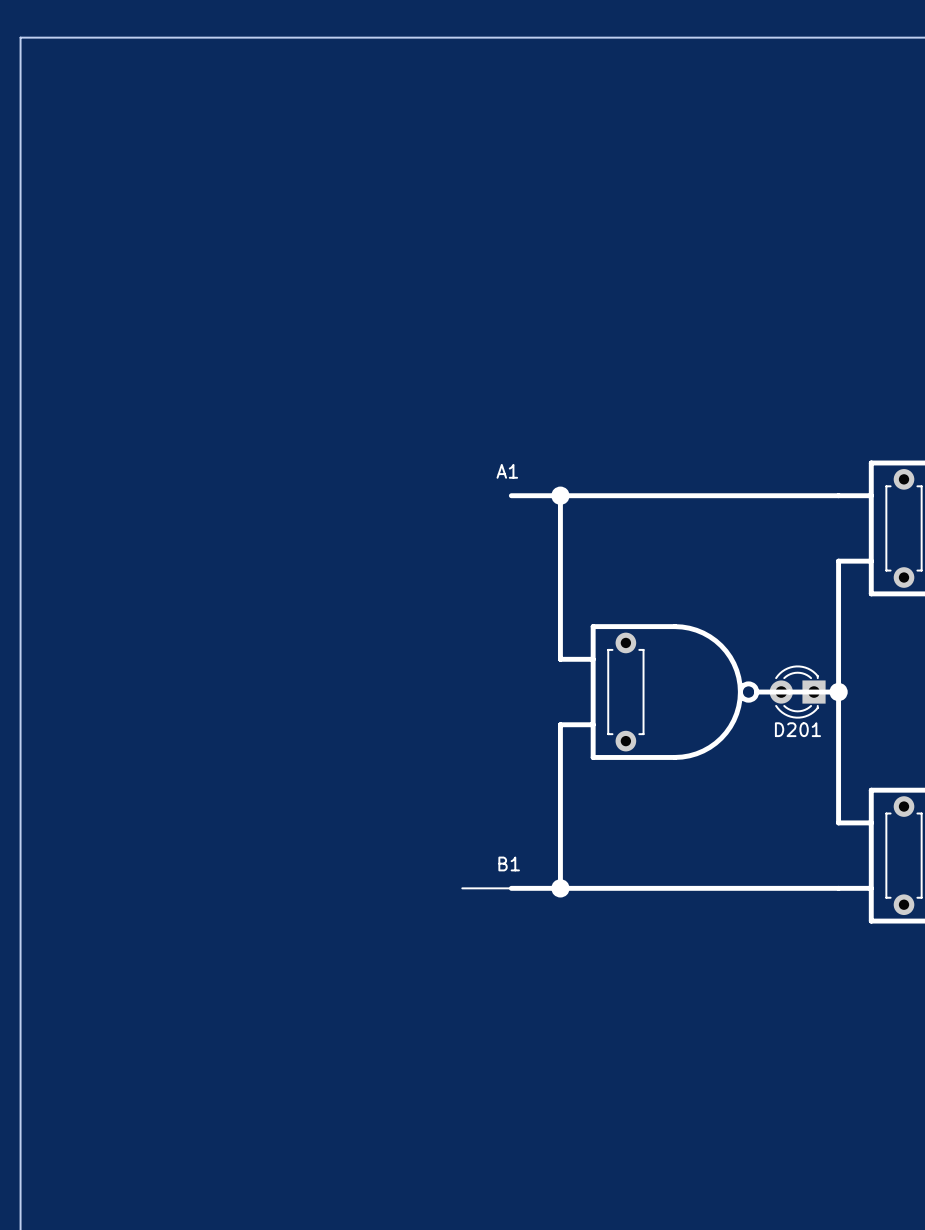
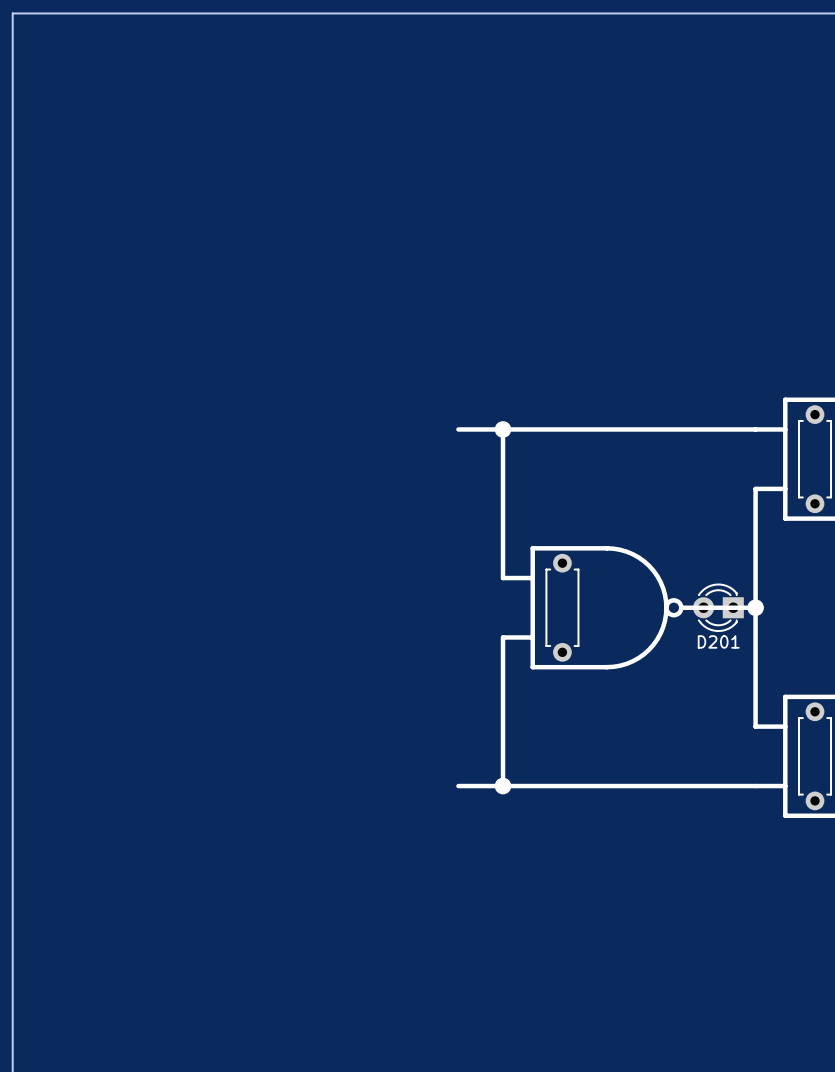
text: A1 (507, 471) -> none
text: B1 (509, 863) -> none
line: (462, 888) (511, 888) -> none

